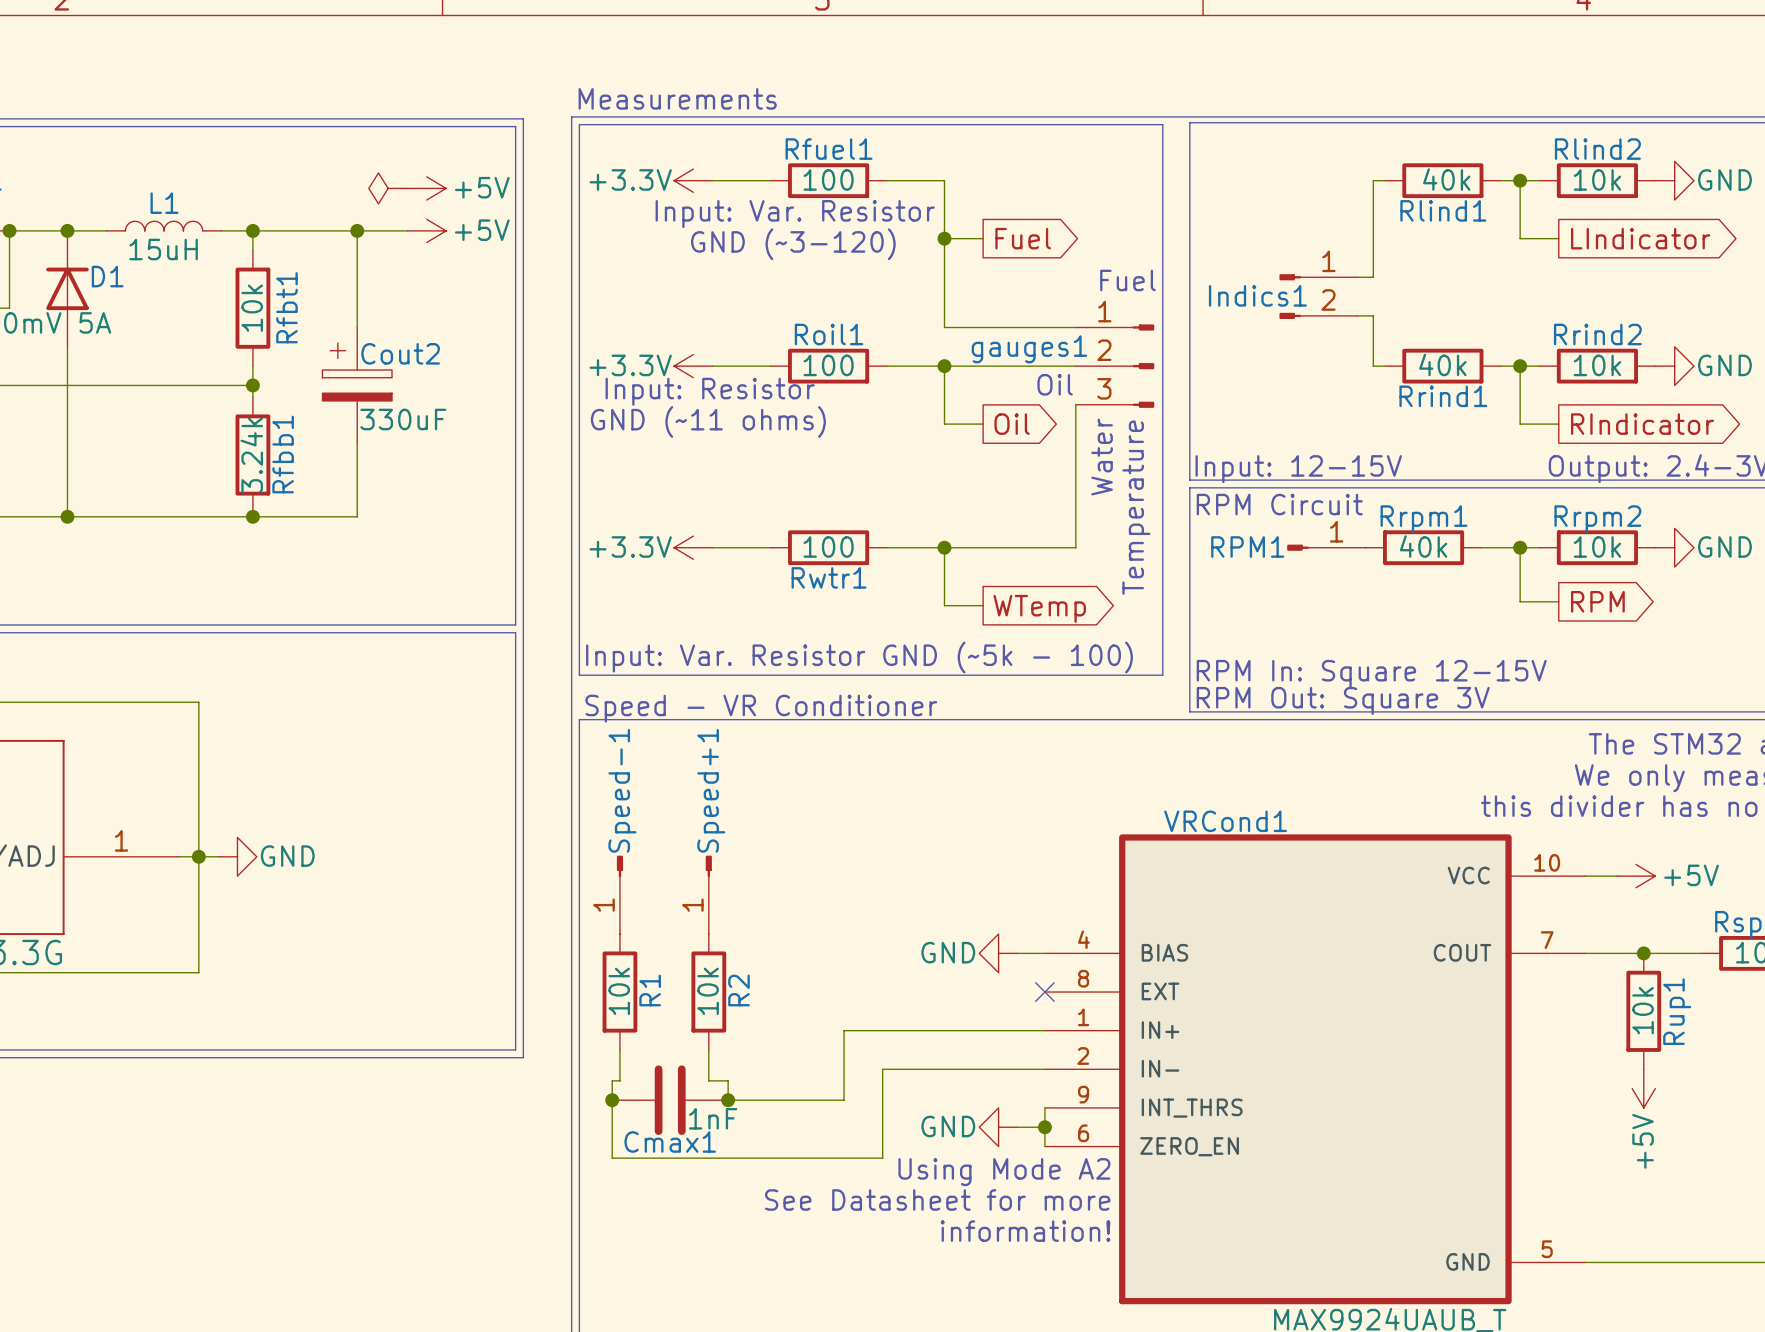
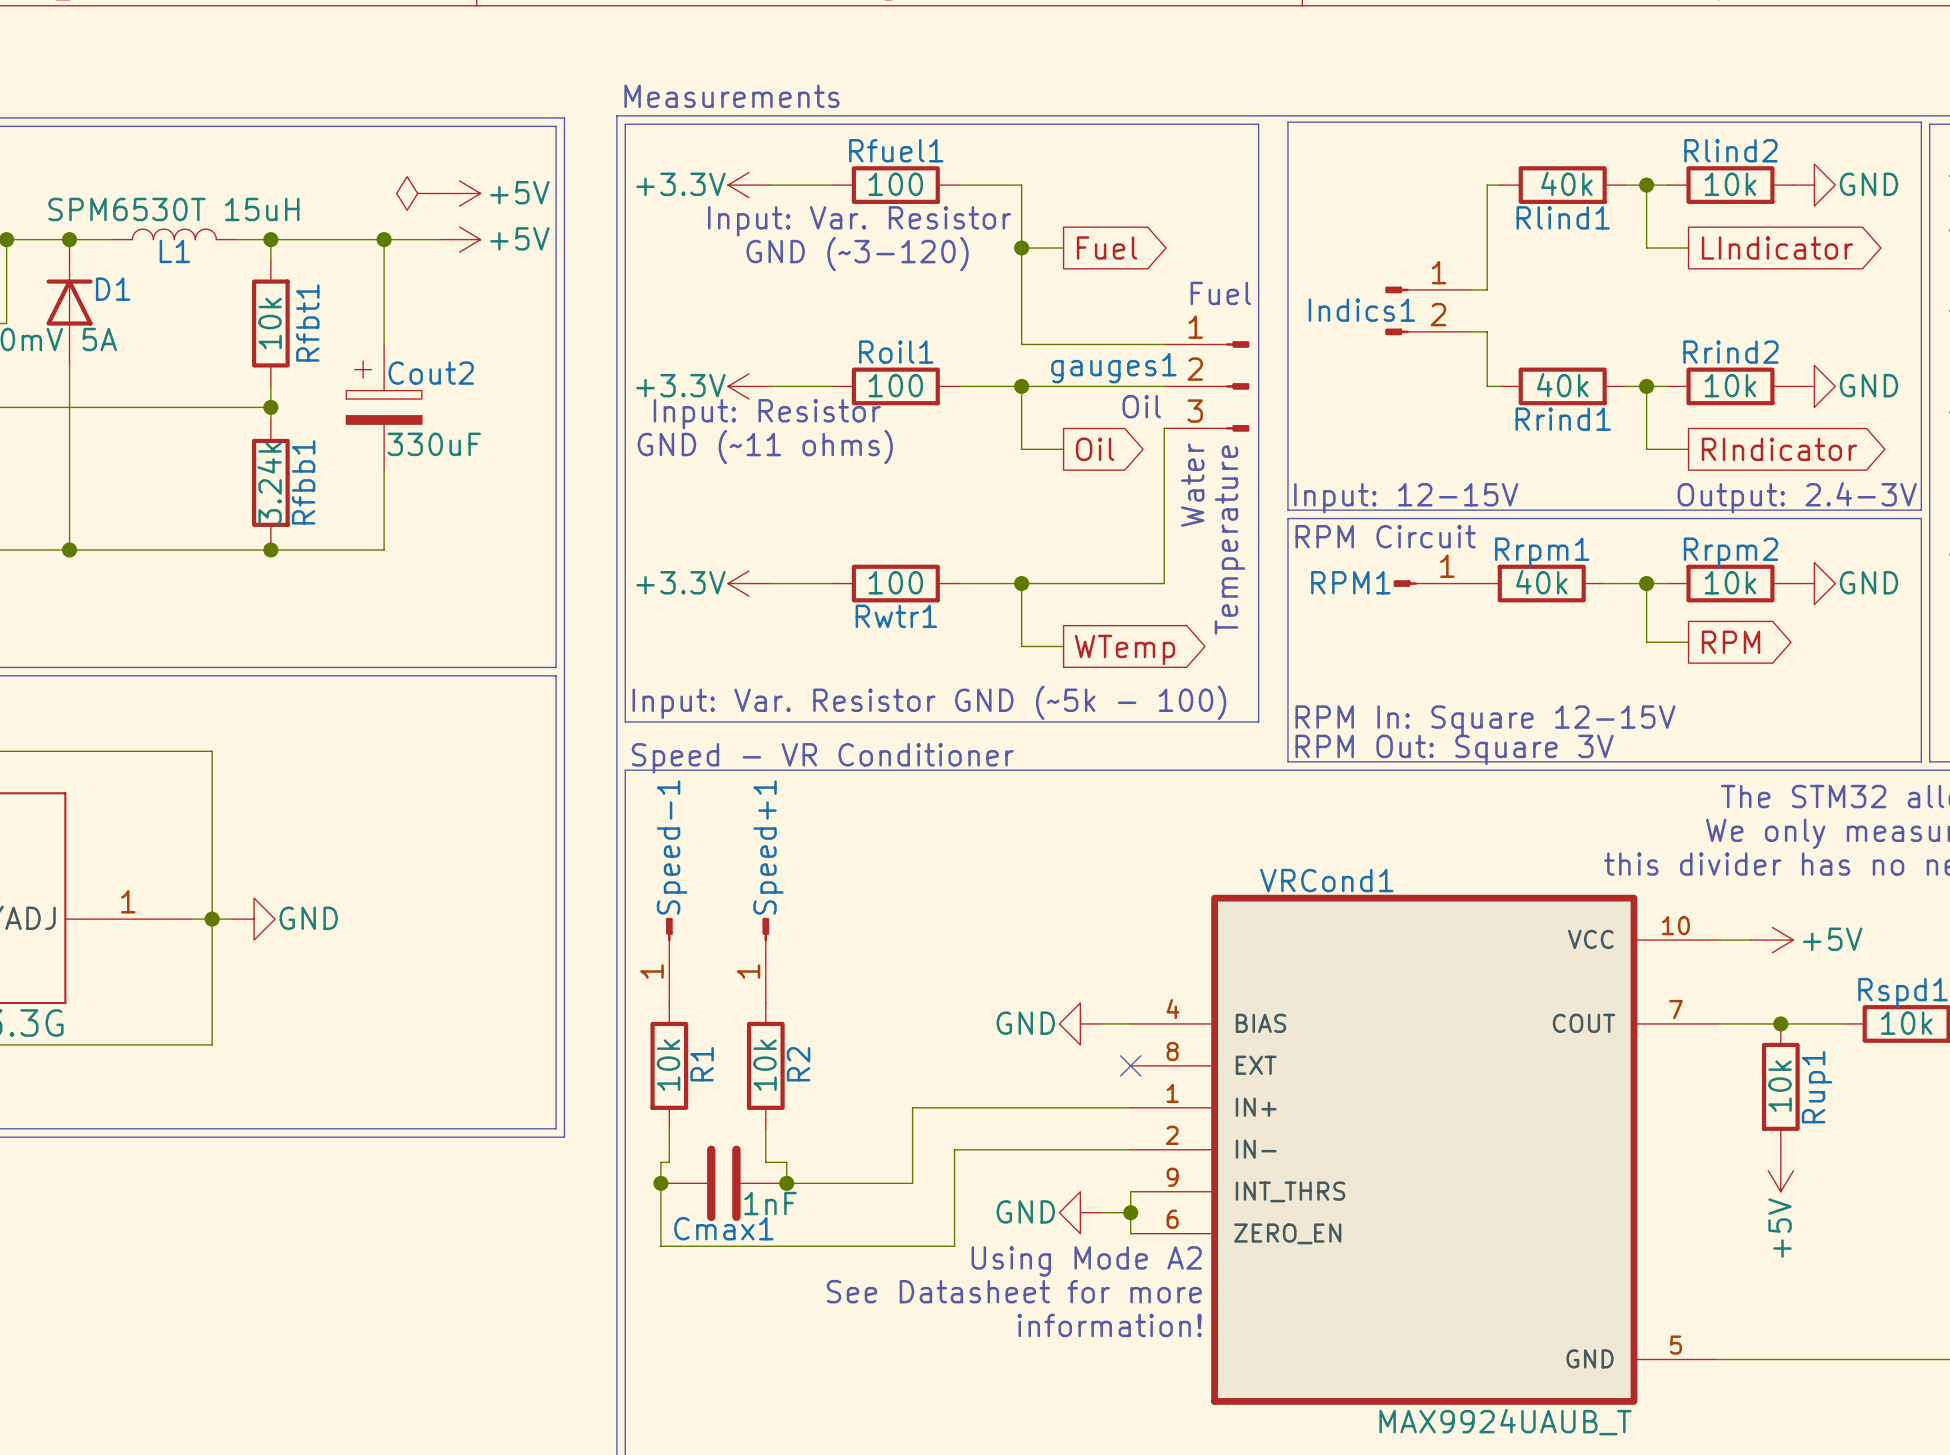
L1 name position: L1 (164, 203) -> L1 (174, 251)
L1 value: 15uH (163, 249) -> SPM6530T 15uH (173, 209)

